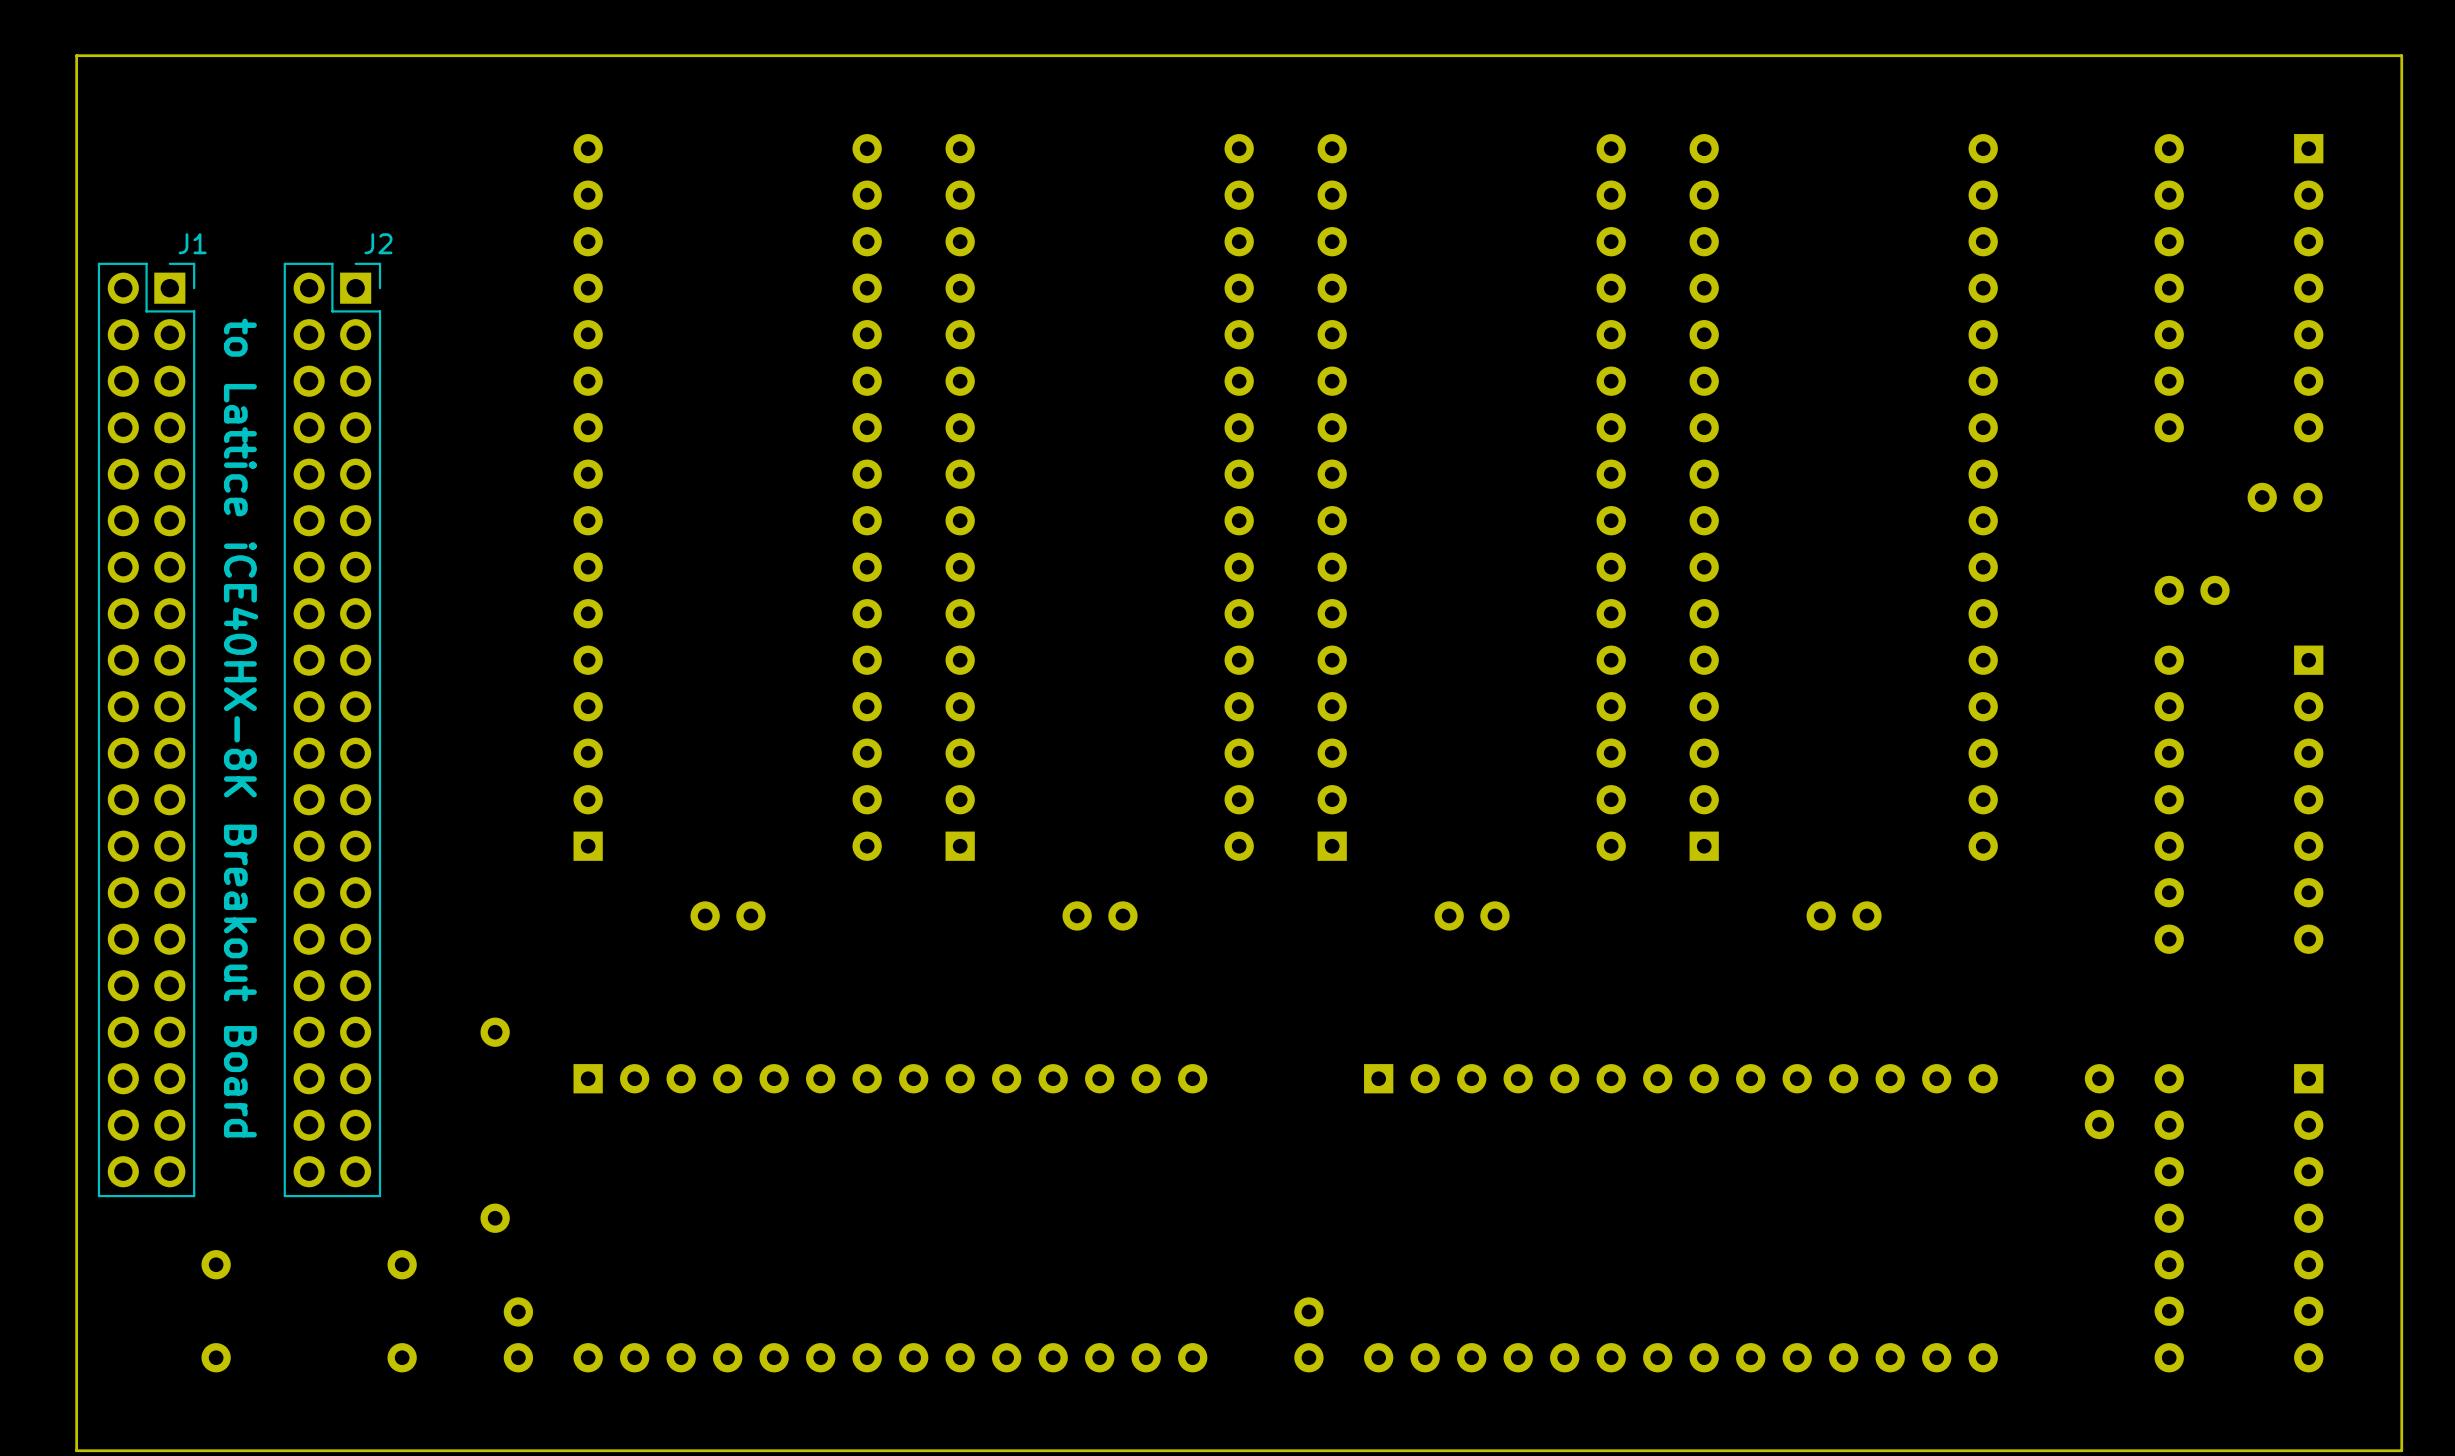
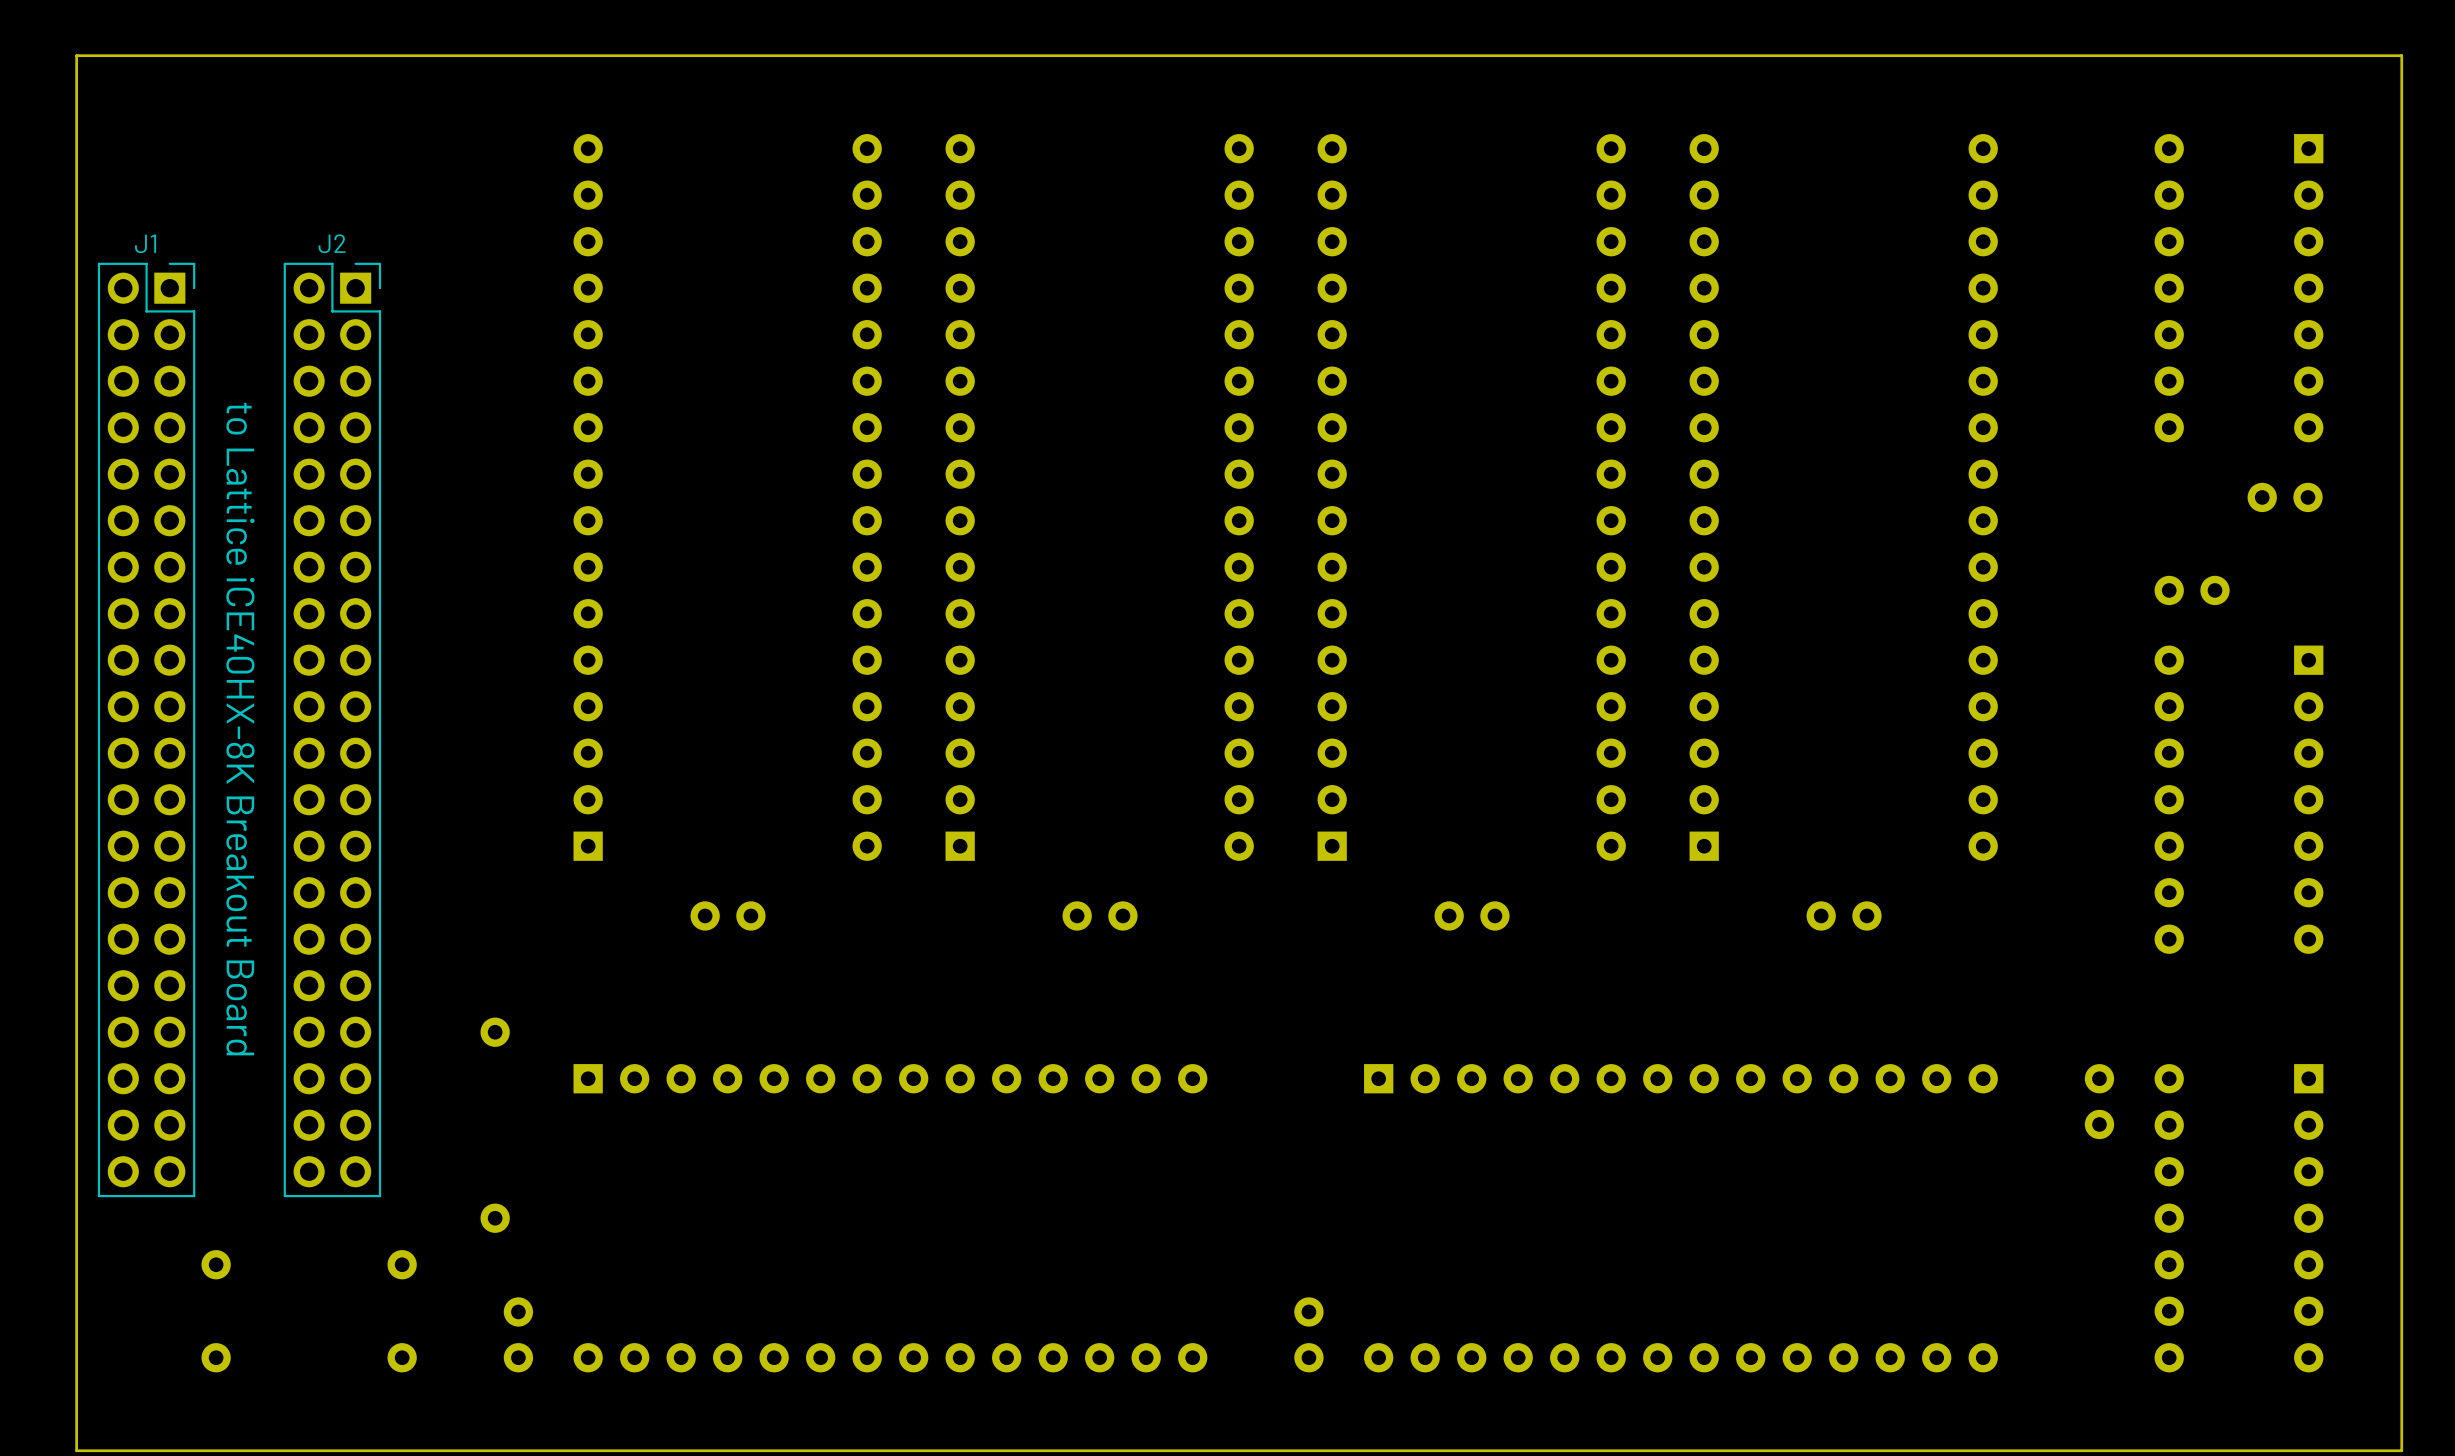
J1 name position: J1 (192, 243) -> J1 (145, 243)
J2 name position: J2 (378, 243) -> J2 (332, 243)

